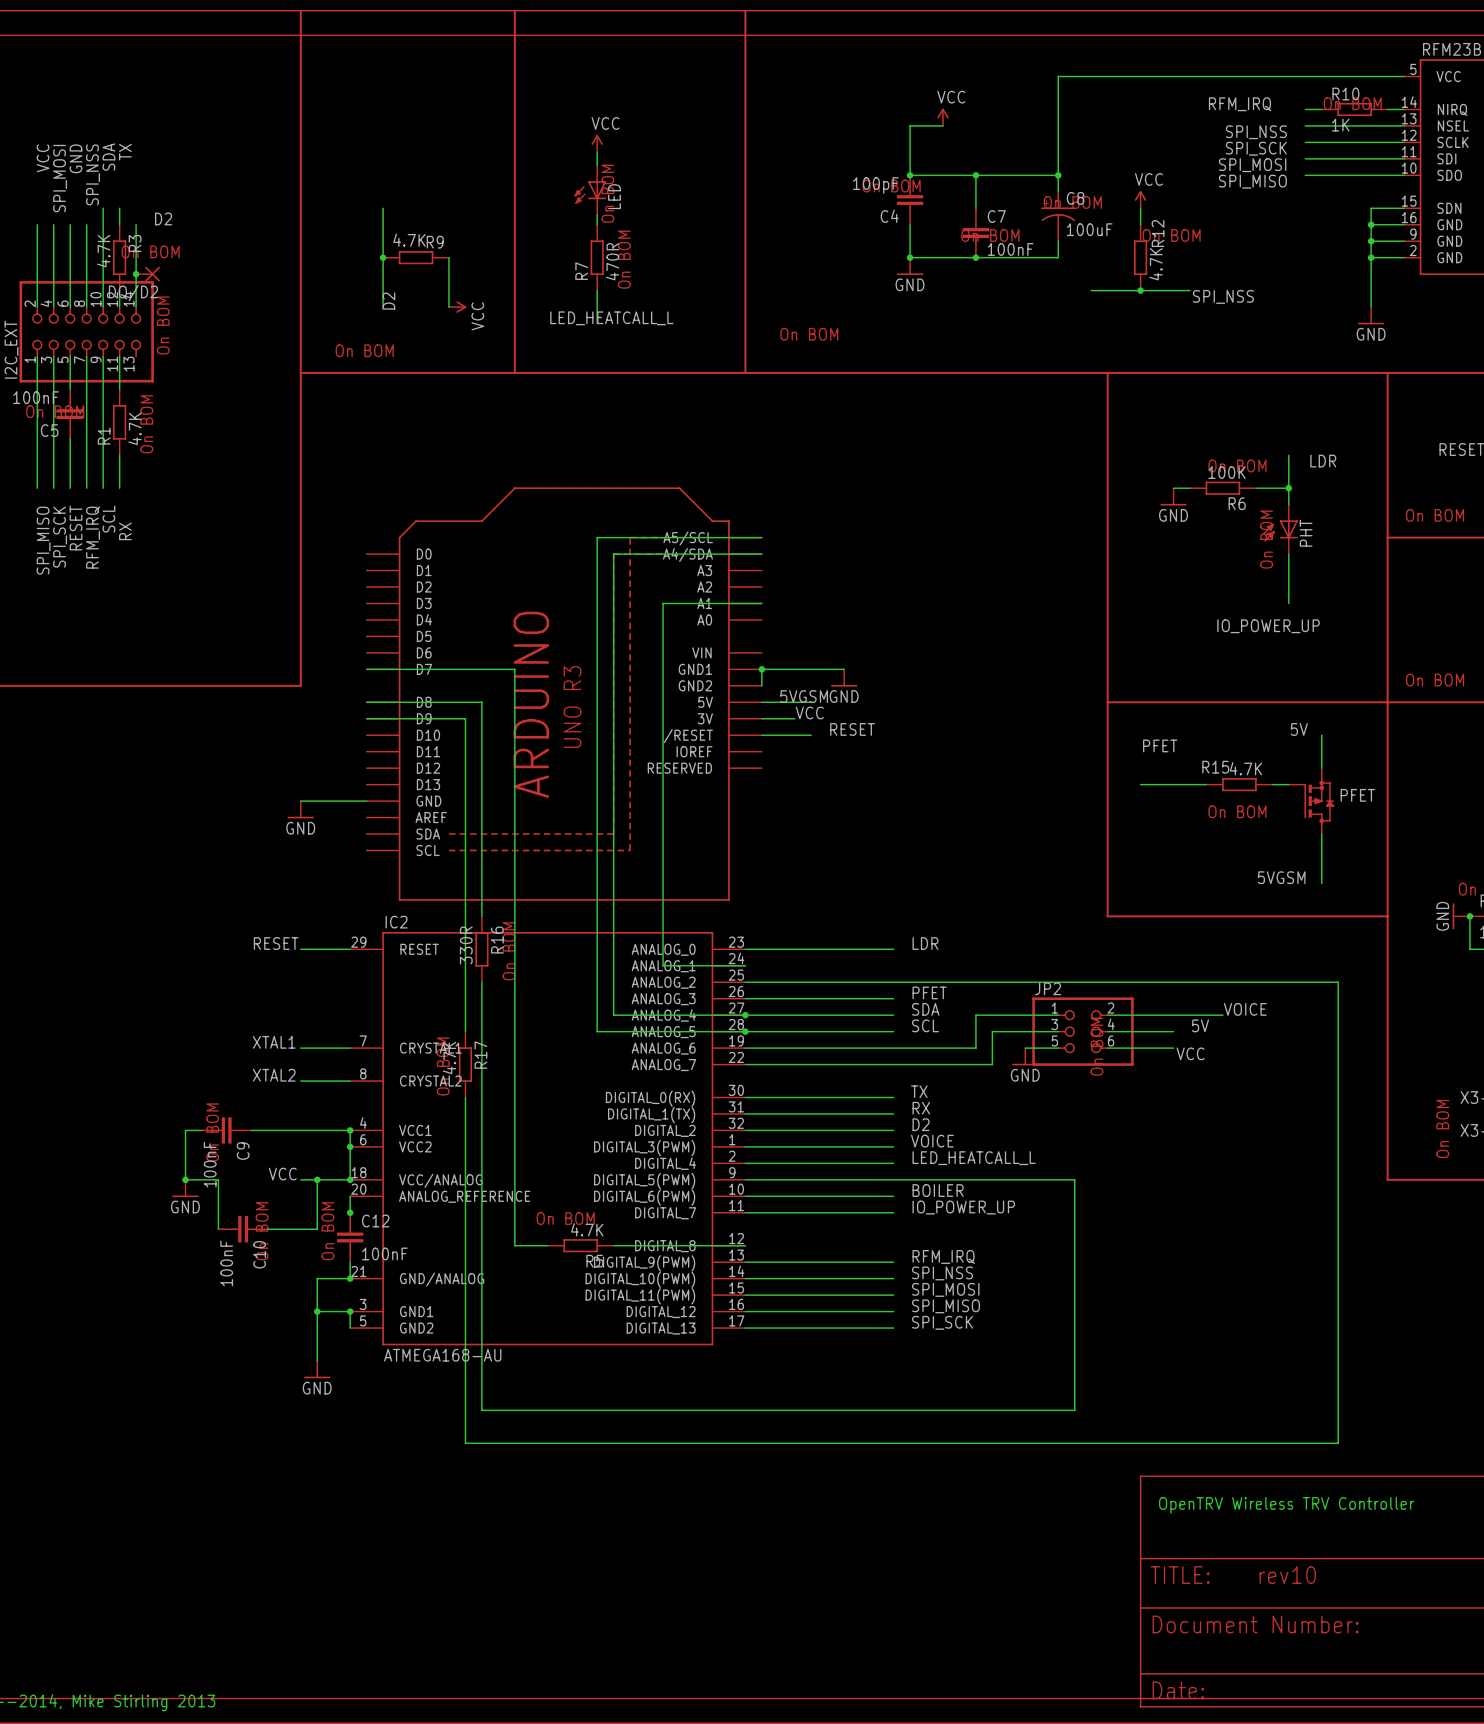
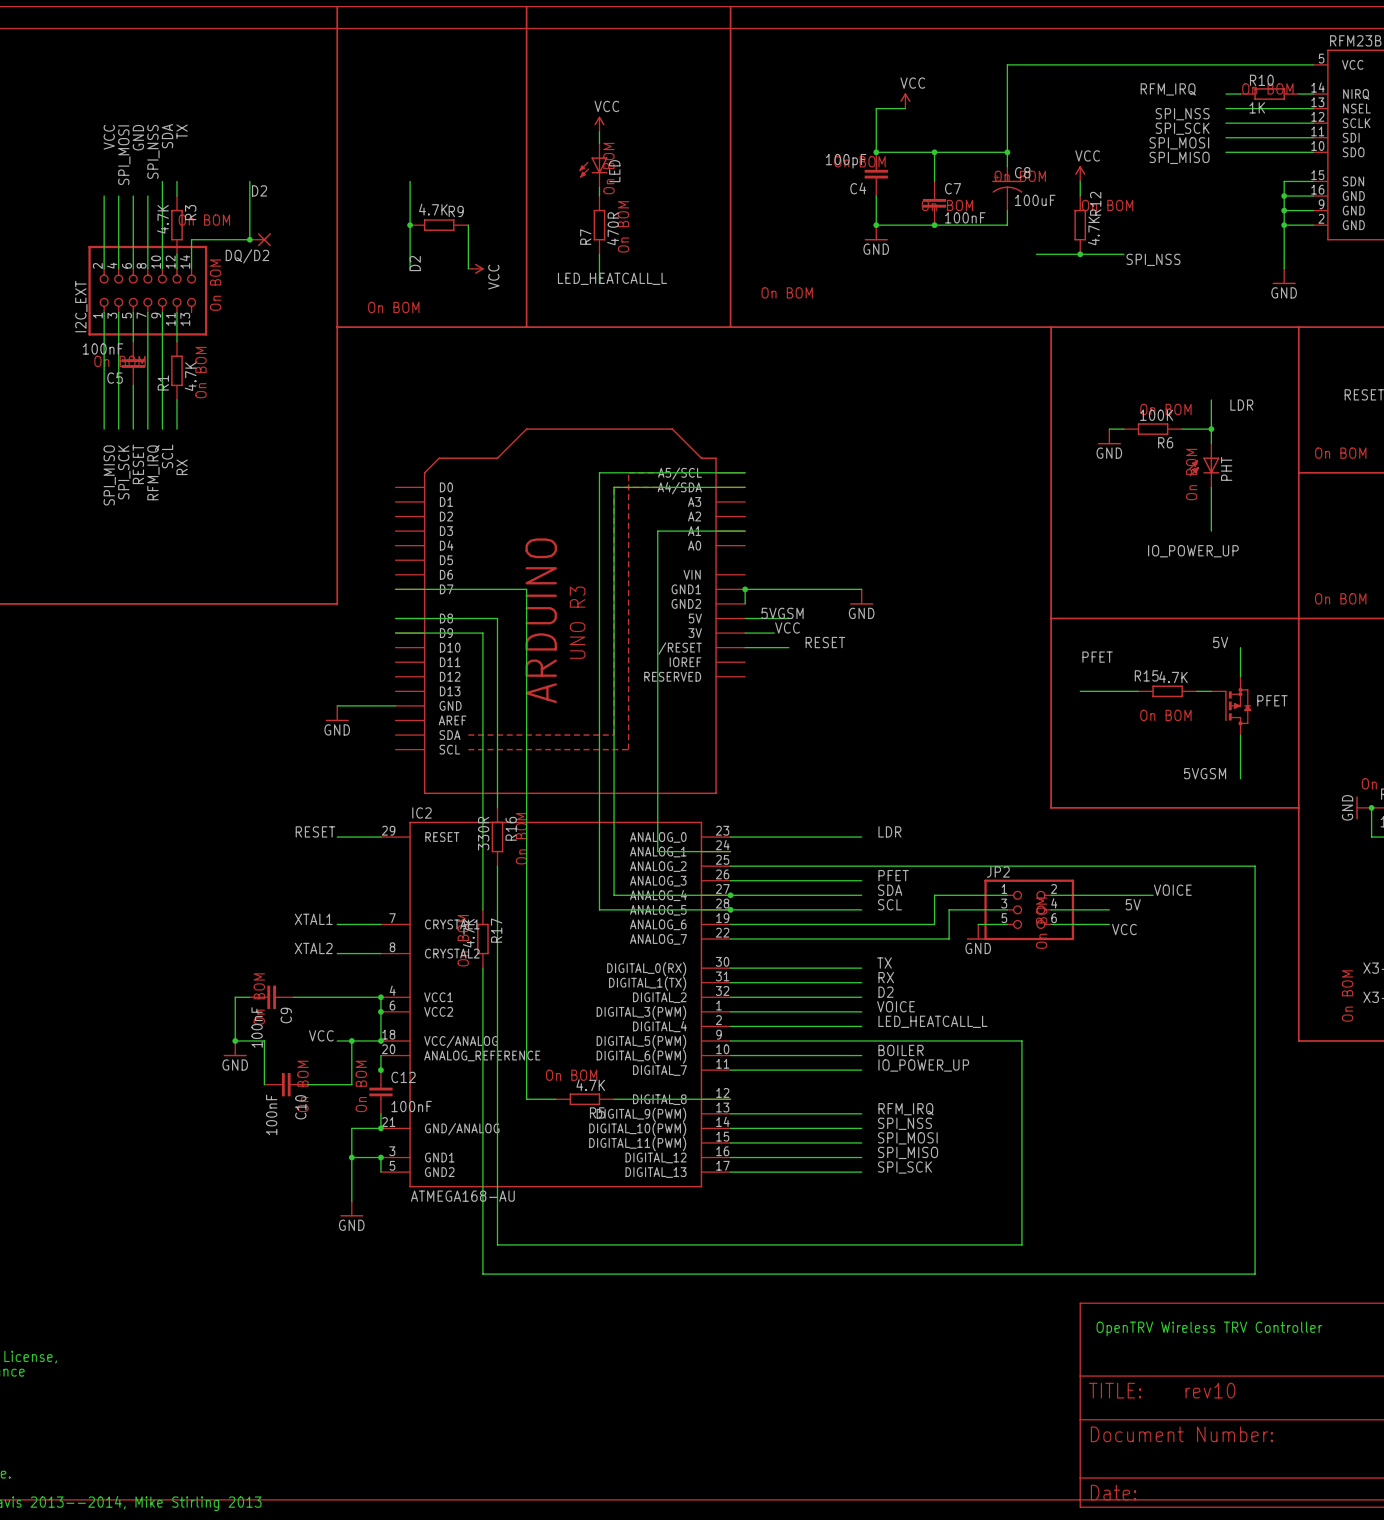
label position: D2 (163, 218) -> D2 (259, 190)
wire: (136, 224) (136, 274) -> (249, 181) (249, 239) (191, 239)
junction: (136, 274) -> none
DQ/D2 position: (148, 274) -> (260, 239)
junction: none -> (249, 239)
wire: none -> (818, 589) (861, 589)
power symbol position: GND (844, 678) -> GND (861, 597)

